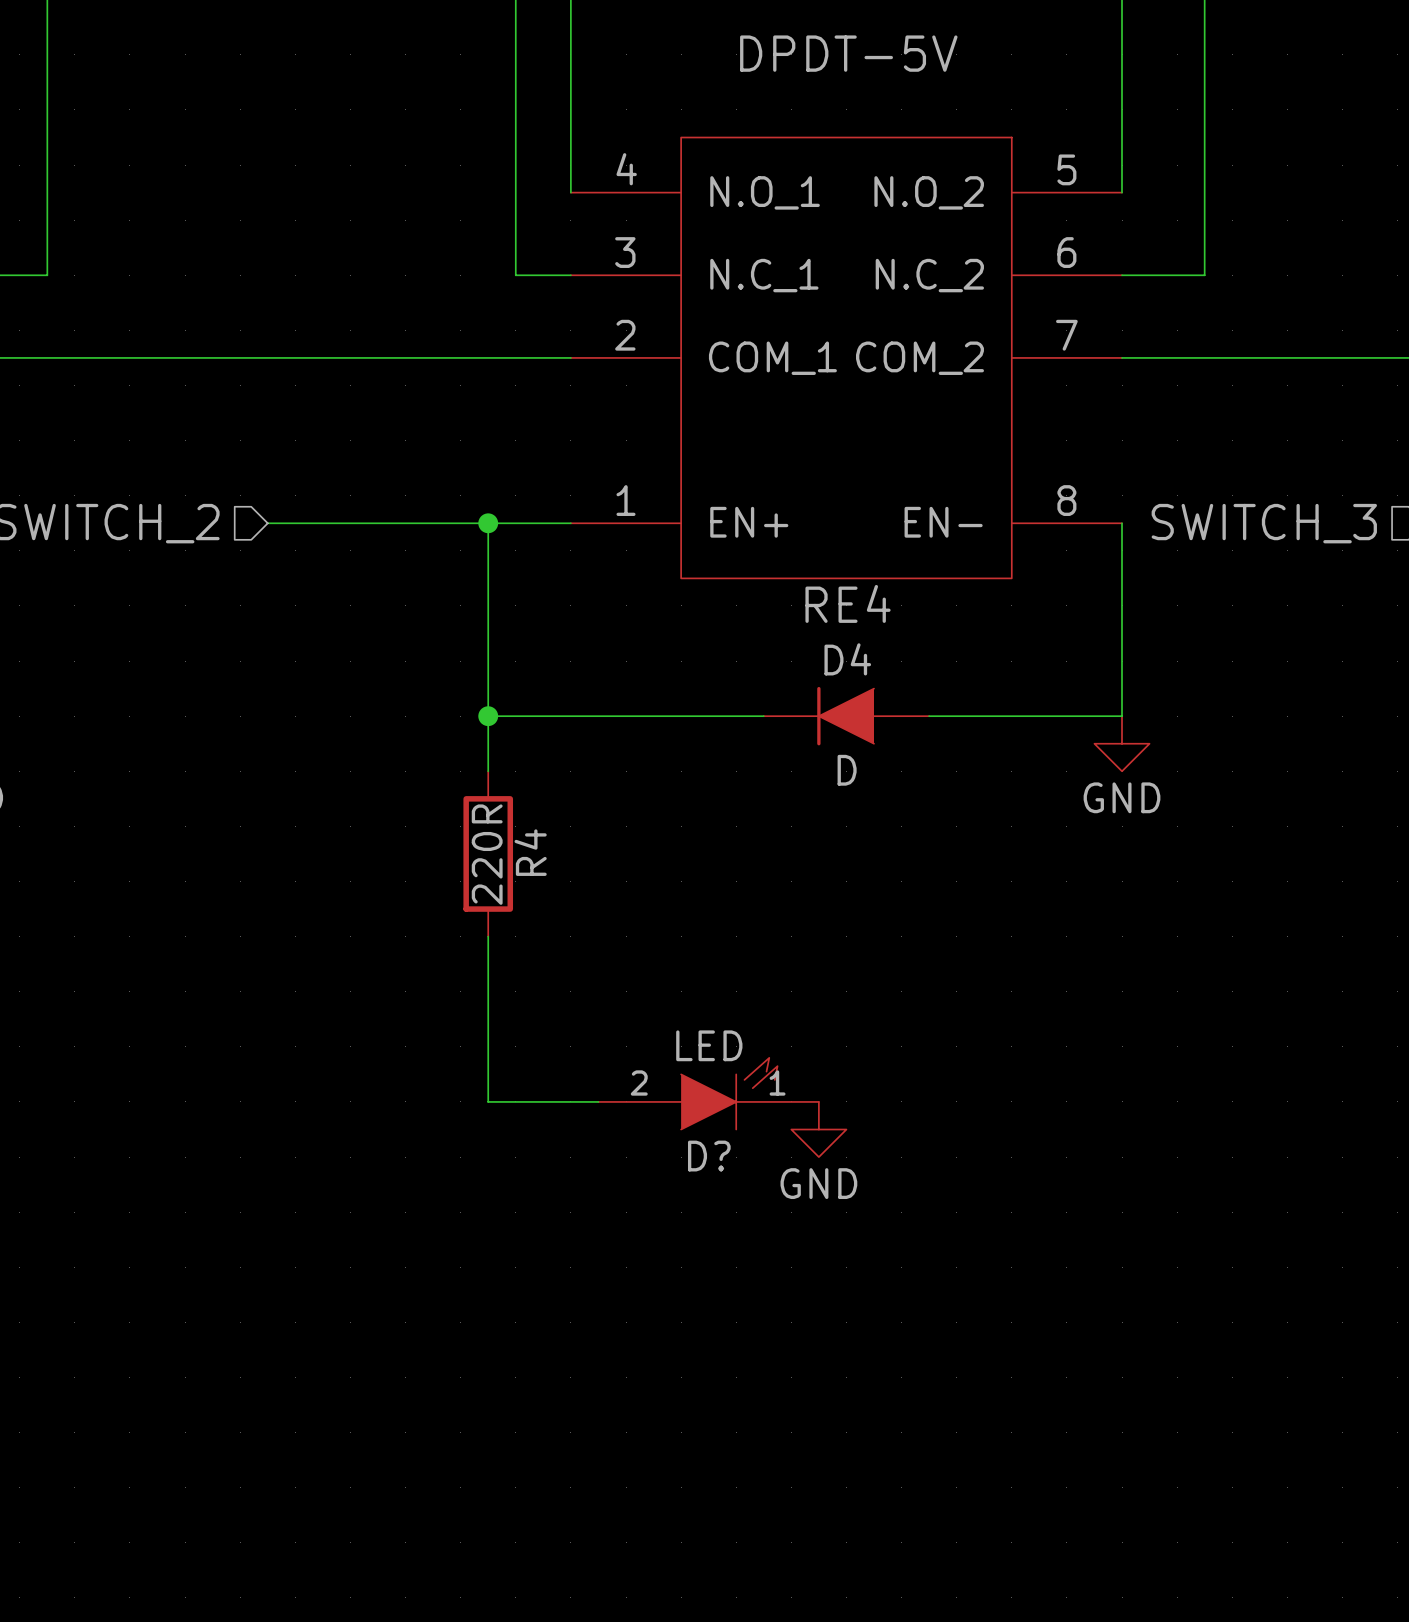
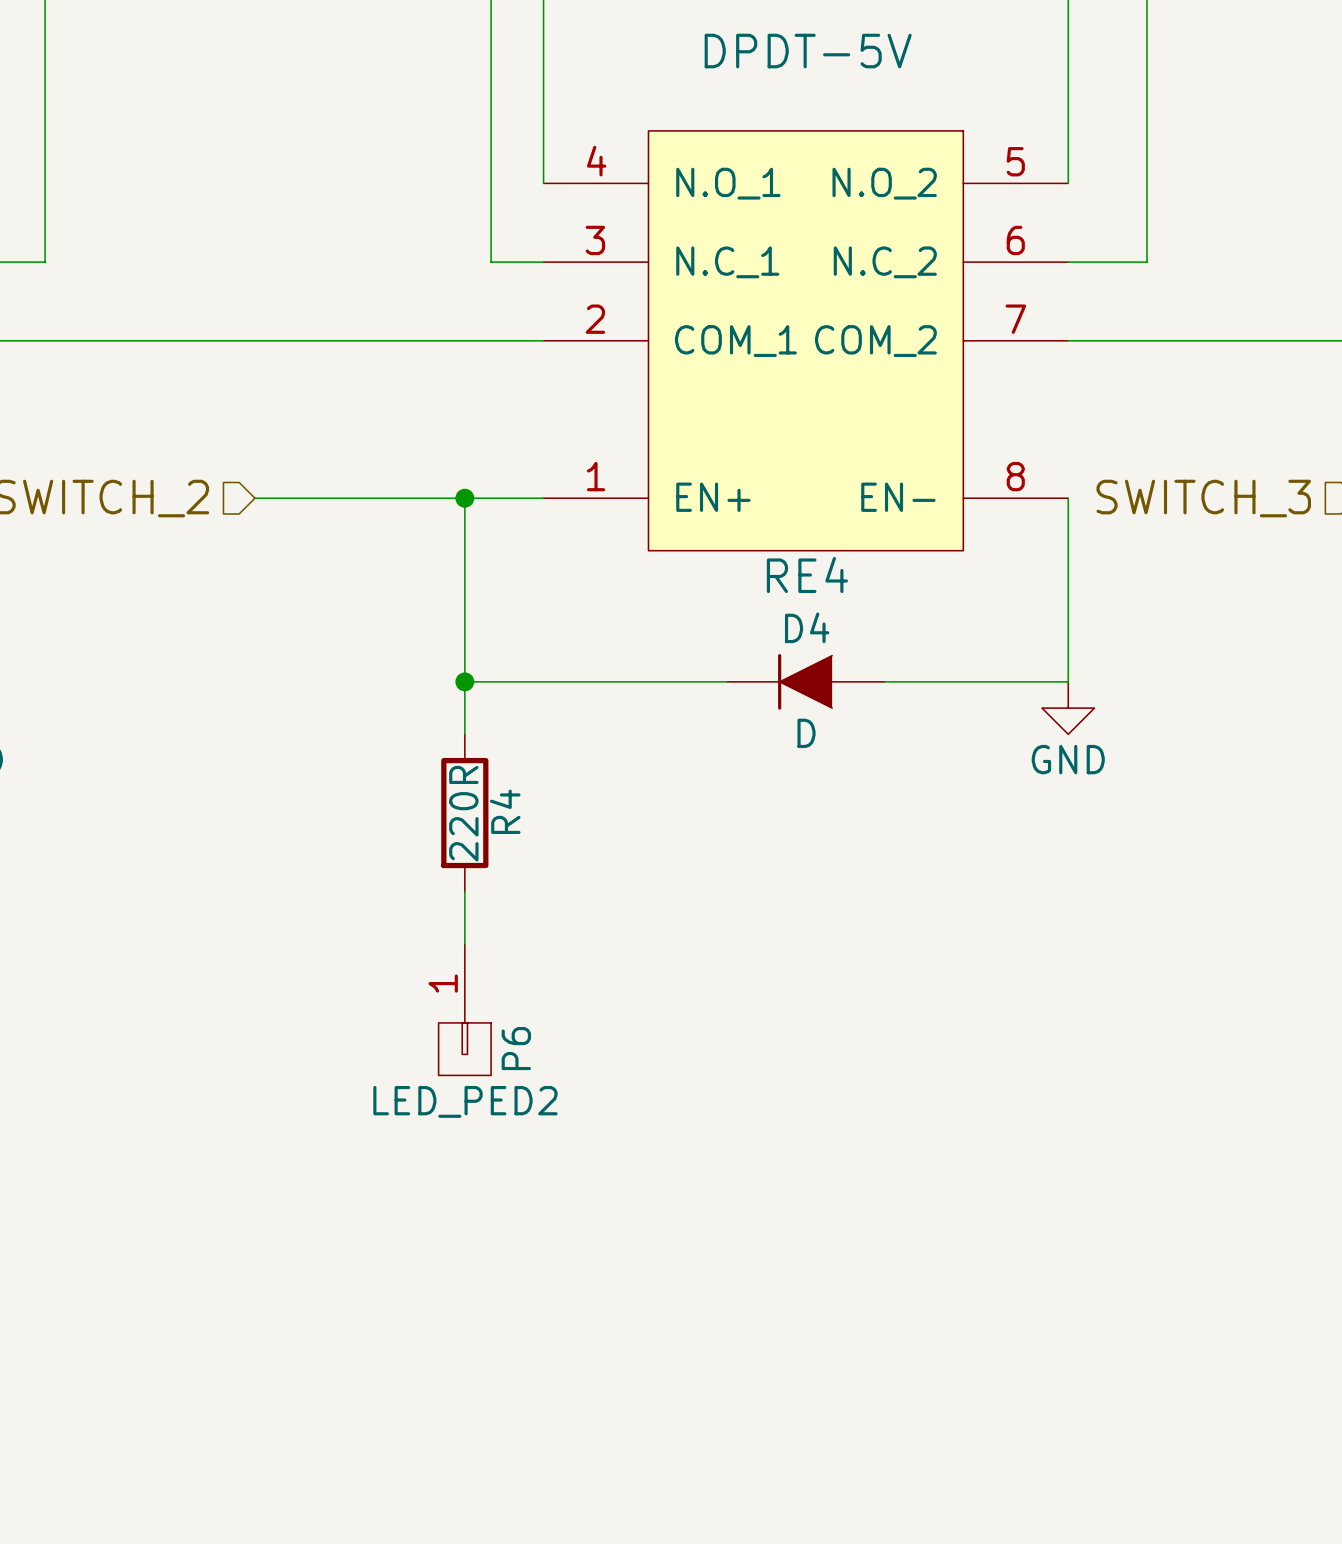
wire: (488, 991) (488, 1101) (598, 1101) -> none
P6: none -> LED_PED2 (464, 1009)
D?: LED (708, 1093) -> none
power symbol: GND (818, 1129) -> none

